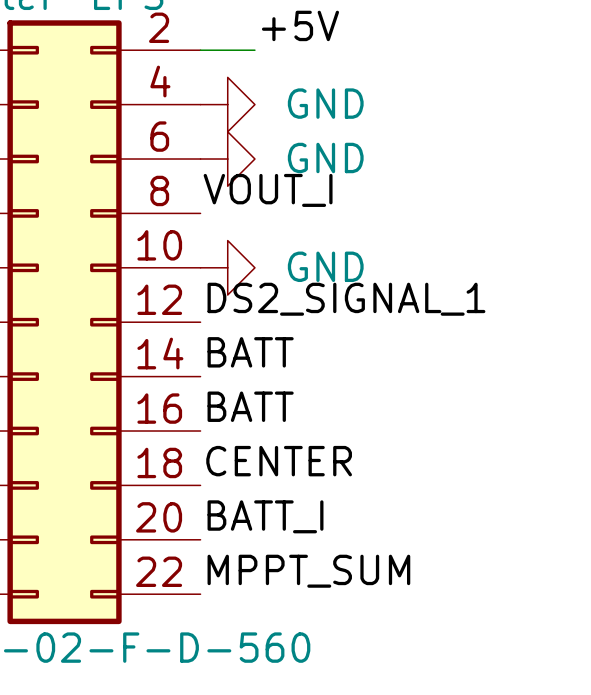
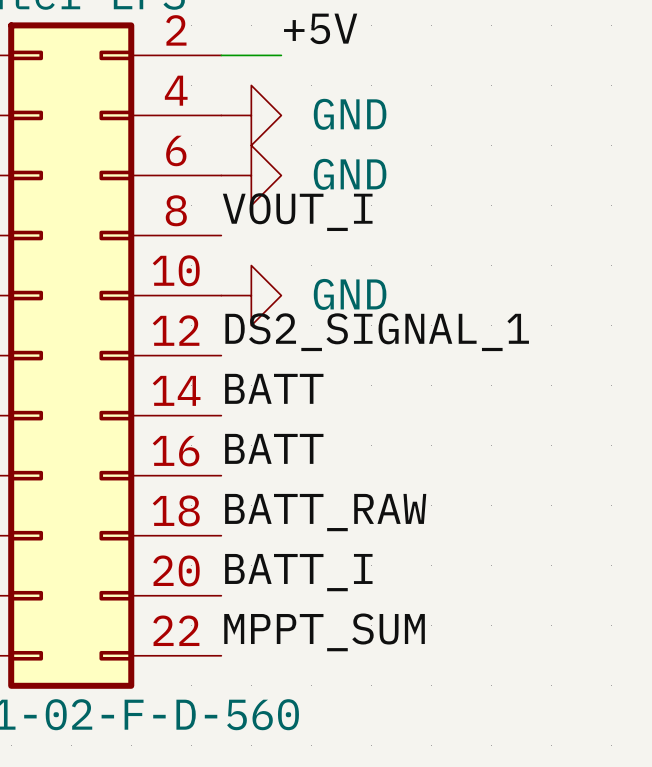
label: CENTER (279, 461) -> BATT_RAW (325, 512)

